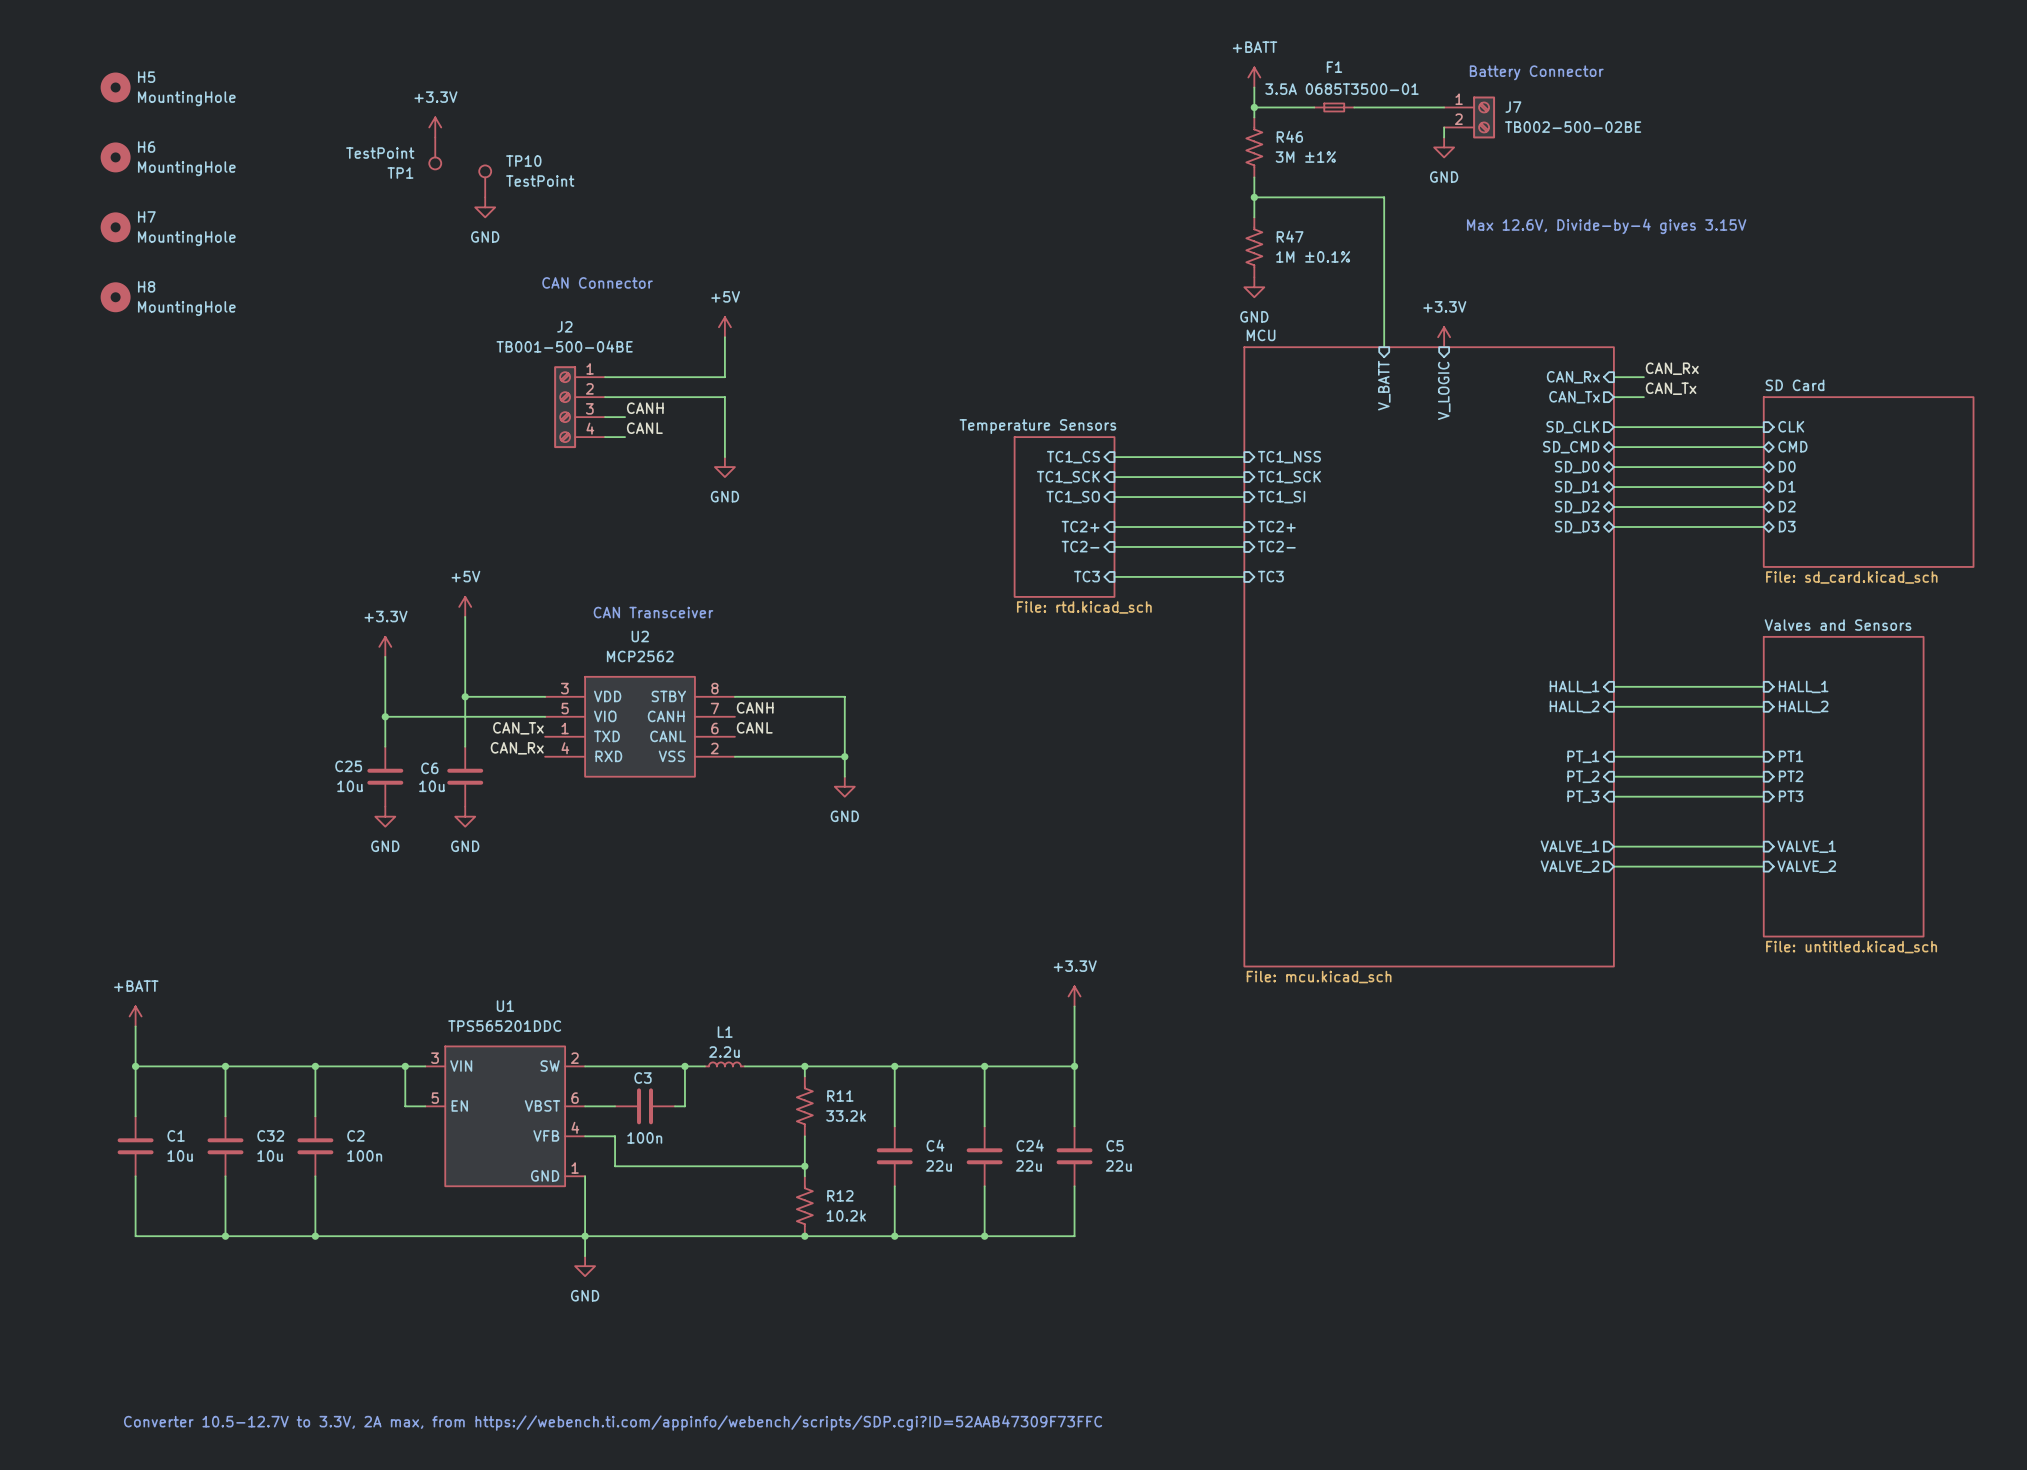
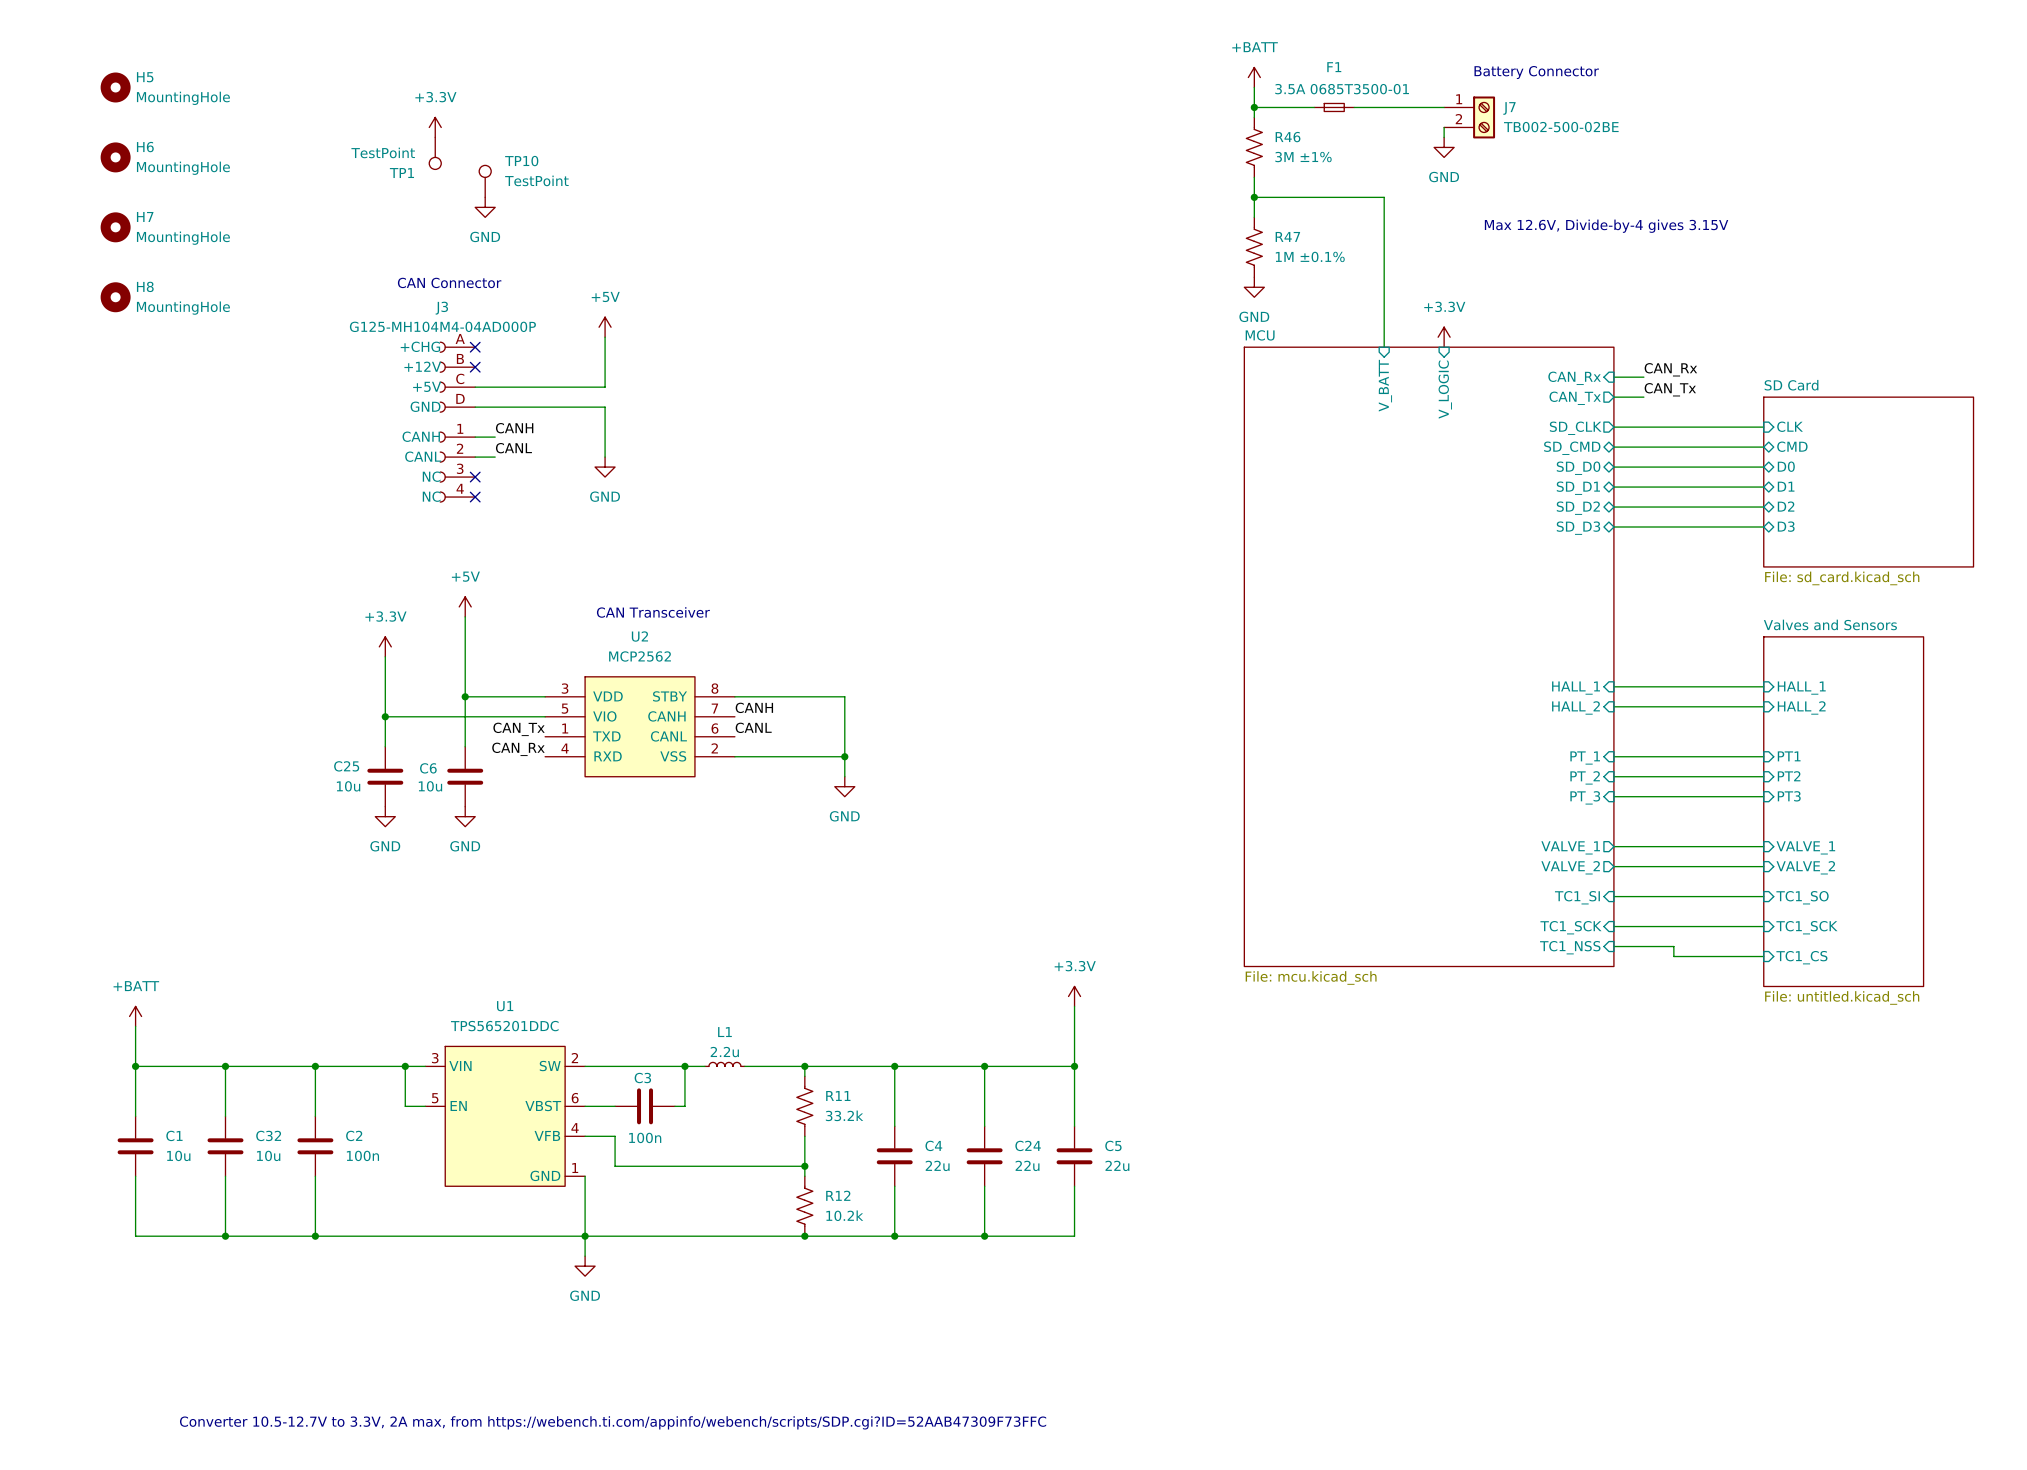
text position: CAN Connector (597, 282) -> CAN Connector (449, 282)
power symbol position: +5V (724, 327) -> +5V (605, 327)
wire: none -> (605, 337) (605, 387) (475, 387)
wire: (724, 337) (724, 377) (605, 377) -> none
no-connect mark: none -> (475, 347)
no-connect mark: none -> (475, 367)
wire: (605, 397) (724, 397) (724, 457) -> none
wire: none -> (475, 407) (605, 407) (605, 457)
J2: TB001-500-04BE (579, 407) -> none
label position: CANH (645, 408) -> CANH (514, 428)
wire: (605, 417) (625, 417) -> (475, 437) (495, 437)
J3: none -> G125-MH104M4-04AD000P (457, 422)
label position: CANL (644, 428) -> CANL (513, 448)
wire: (605, 437) (625, 437) -> (475, 457) (495, 457)
sheet pin: TC1_CS (1073, 457) -> none
wire: (1114, 457) (1244, 457) -> none
sheet pin: TC1_NSS (1289, 457) -> none
power symbol position: GND (724, 467) -> GND (605, 467)
no-connect mark: none -> (475, 477)
sheet pin: TC1_SCK (1068, 477) -> none
wire: (1114, 477) (1244, 477) -> none
sheet pin: TC1_SCK (1289, 477) -> none
no-connect mark: none -> (475, 497)
sheet pin: TC1_SO (1073, 497) -> none
wire: (1114, 497) (1244, 497) -> none
sheet pin: TC1_SI (1281, 497) -> none
sheet Temperature Sensors: File: rtd.kicad_sch (1064, 517) -> none
sheet pin: TC2+ (1080, 526) -> none
sheet pin: TC2+ (1276, 526) -> none
wire: (1114, 527) (1244, 527) -> none
sheet pin: TC2- (1080, 546) -> none
wire: (1114, 546) (1244, 546) -> none
sheet pin: TC2- (1276, 546) -> none
sheet pin: TC3 (1086, 576) -> none
wire: (1114, 576) (1244, 576) -> none
sheet pin: TC3 (1270, 576) -> none
sheet Valves and Sensors: File: untitled.kicad_sch (1843, 786) -> none
sheet Valves and Sensors: none -> File: untitled.kicad_sch (1843, 811)
sheet pin: none -> TC1_SI (1577, 897)
wire: none -> (1613, 896) (1763, 896)
sheet pin: none -> TC1_SO (1802, 897)
sheet pin: none -> TC1_SCK (1570, 927)
wire: none -> (1613, 926) (1763, 926)
sheet pin: none -> TC1_SCK (1806, 927)
sheet pin: none -> TC1_NSS (1570, 947)
wire: none -> (1613, 946) (1673, 946) (1673, 956) (1763, 956)
sheet pin: none -> TC1_CS (1801, 957)

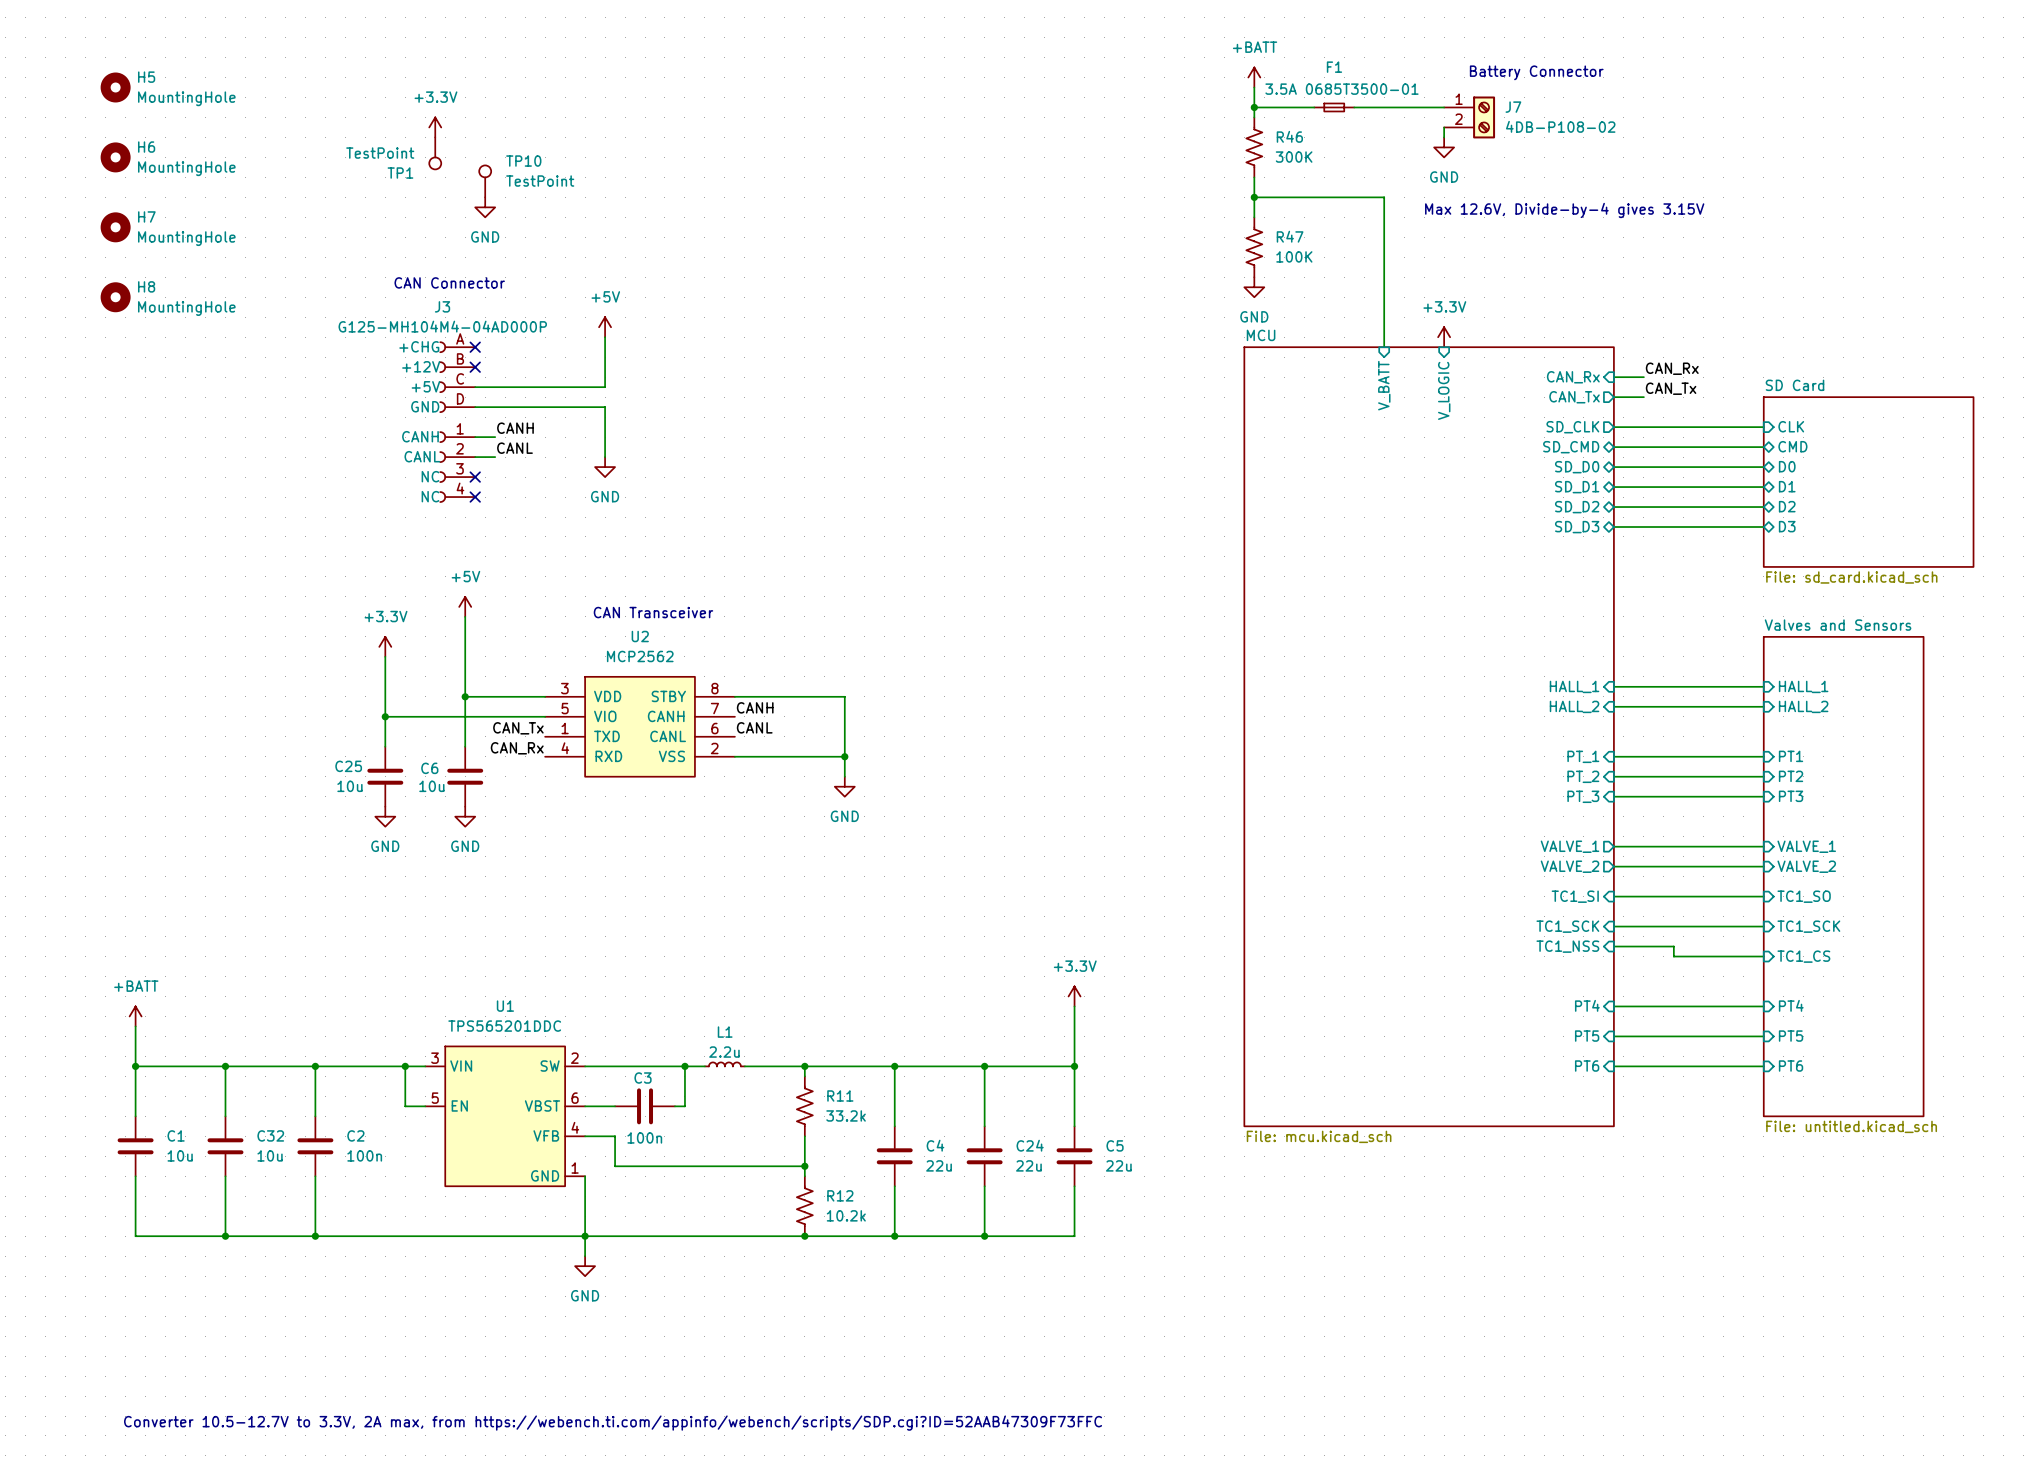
J7 value: TB002-500-02BE (1561, 127) -> 4DB-P108-02 (1560, 126)
R46 value: 3M ±1% (1303, 157) -> 300K (1294, 157)
text position: Max 12.6V, Divide-by-4 gives 3.15V (1606, 226) -> Max 12.6V, Divide-by-4 gives 3.15V (1564, 210)
R47 value: 1M ±0.1% (1310, 256) -> 100K (1294, 256)
sheet MCU: File: mcu.kicad_sch (1429, 656) -> none
sheet MCU: none -> File: mcu.kicad_sch (1429, 736)
sheet Valves and Sensors: File: untitled.kicad_sch (1843, 811) -> none
sheet Valves and Sensors: none -> File: untitled.kicad_sch (1843, 876)
sheet pin: none -> PT4 (1587, 1005)
wire: none -> (1613, 1006) (1763, 1006)
sheet pin: none -> PT4 (1791, 1005)
sheet pin: none -> PT5 (1587, 1036)
wire: none -> (1613, 1036) (1763, 1036)
sheet pin: none -> PT5 (1791, 1036)
sheet pin: none -> PT6 (1587, 1066)
wire: none -> (1613, 1066) (1763, 1066)
sheet pin: none -> PT6 (1791, 1066)

